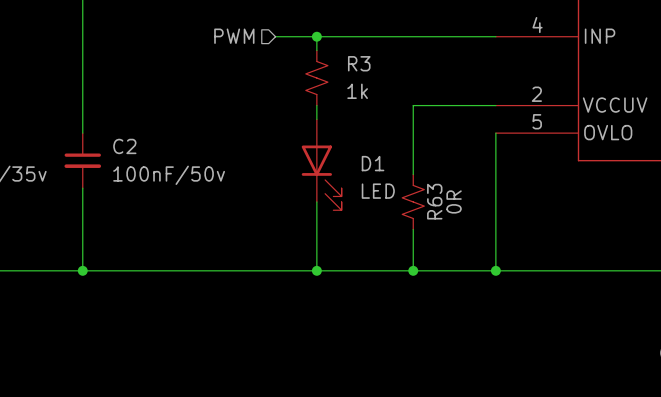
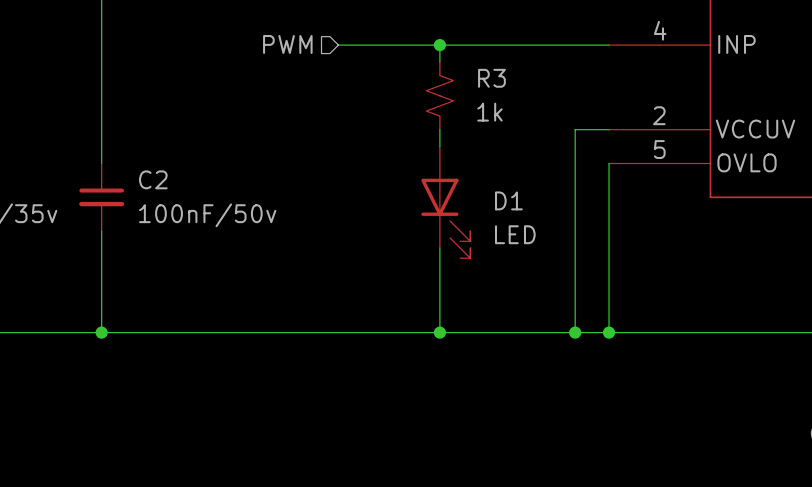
wire: (316, 36) (316, 50) -> (439, 45) (439, 62)
junction position: (316, 36) -> (439, 45)
R3 position: (316, 78) -> (439, 95)
wire: (316, 105) (316, 119) -> (439, 129) (439, 146)
wire: (468, 105) (413, 105) (413, 174) -> (575, 129) (575, 332)
D1 position: (321, 164) -> (445, 202)
wire: (316, 201) (316, 270) -> (439, 248) (439, 332)
R63: 0R (413, 201) -> none
wire: (413, 229) (413, 270) -> none
junction: (316, 270) -> none
junction: none -> (439, 332)
junction: (413, 270) -> none
junction: none -> (575, 332)

